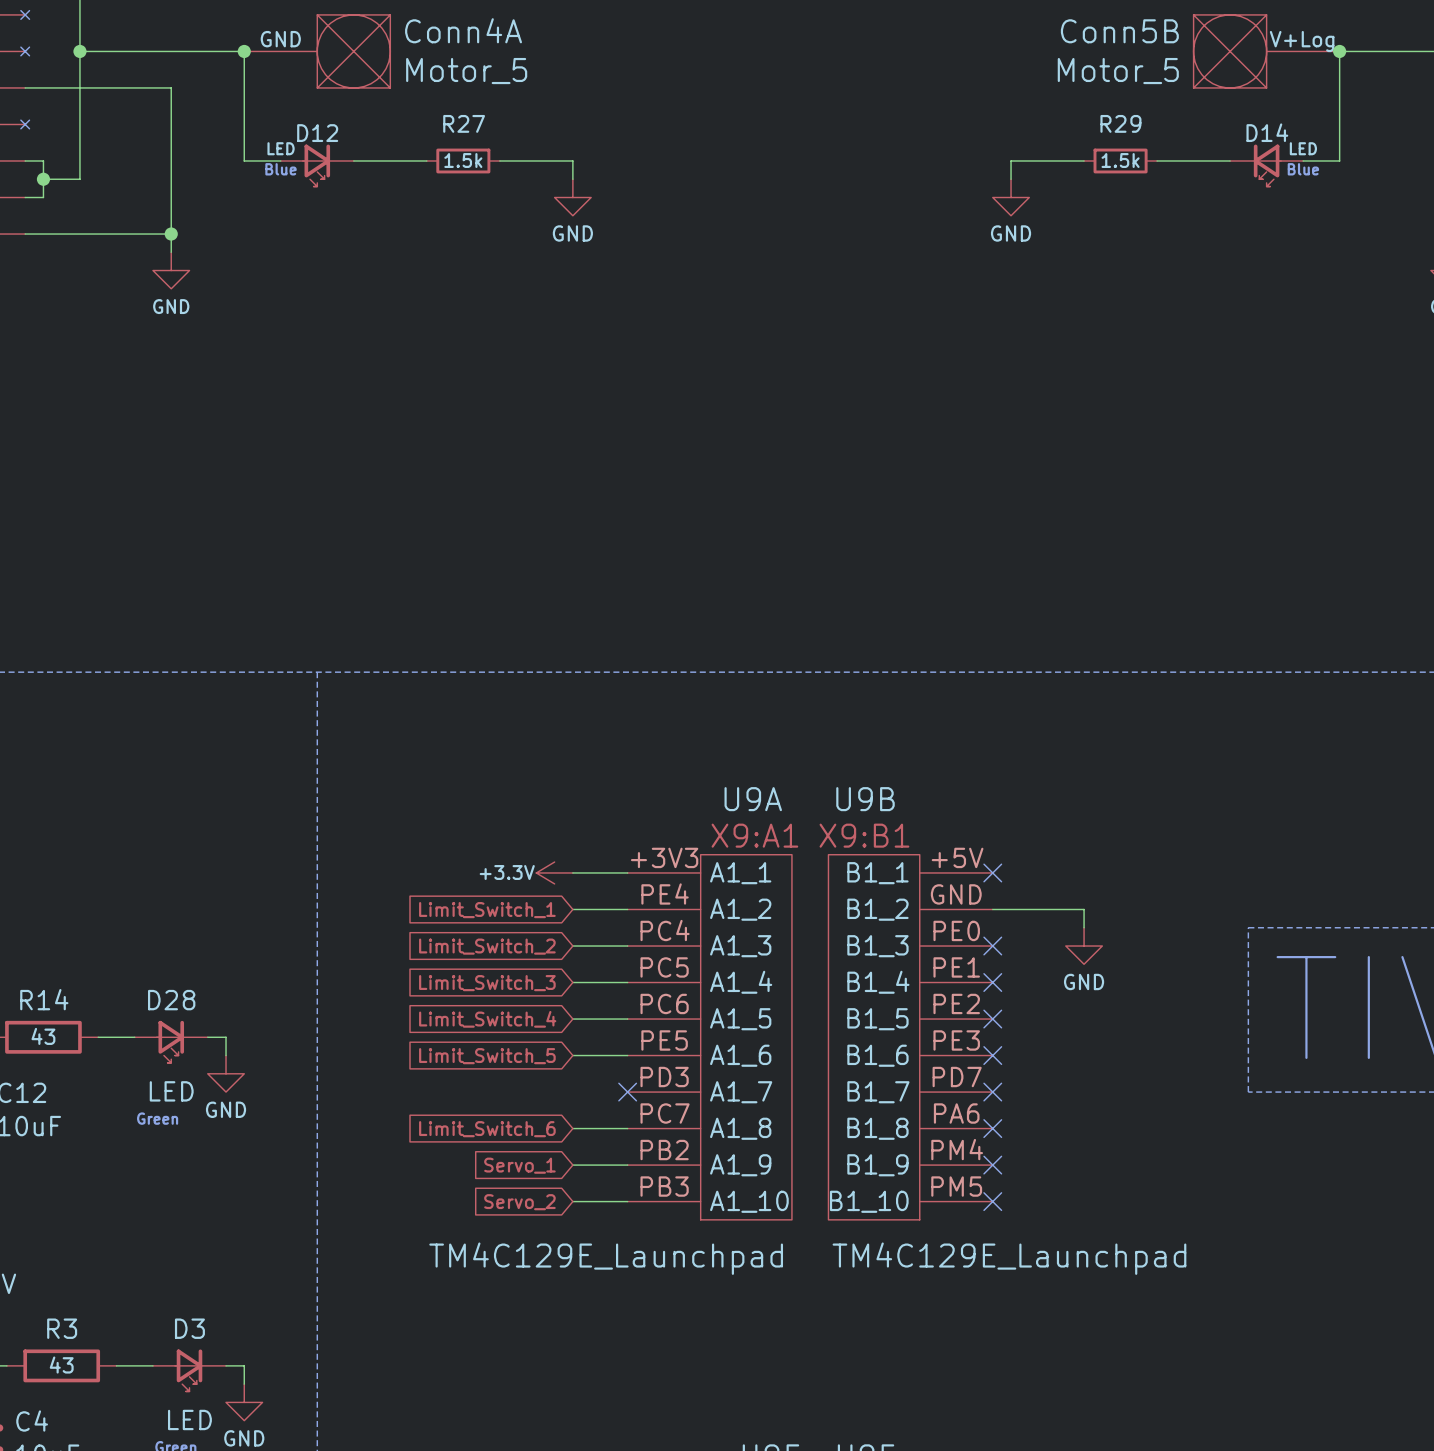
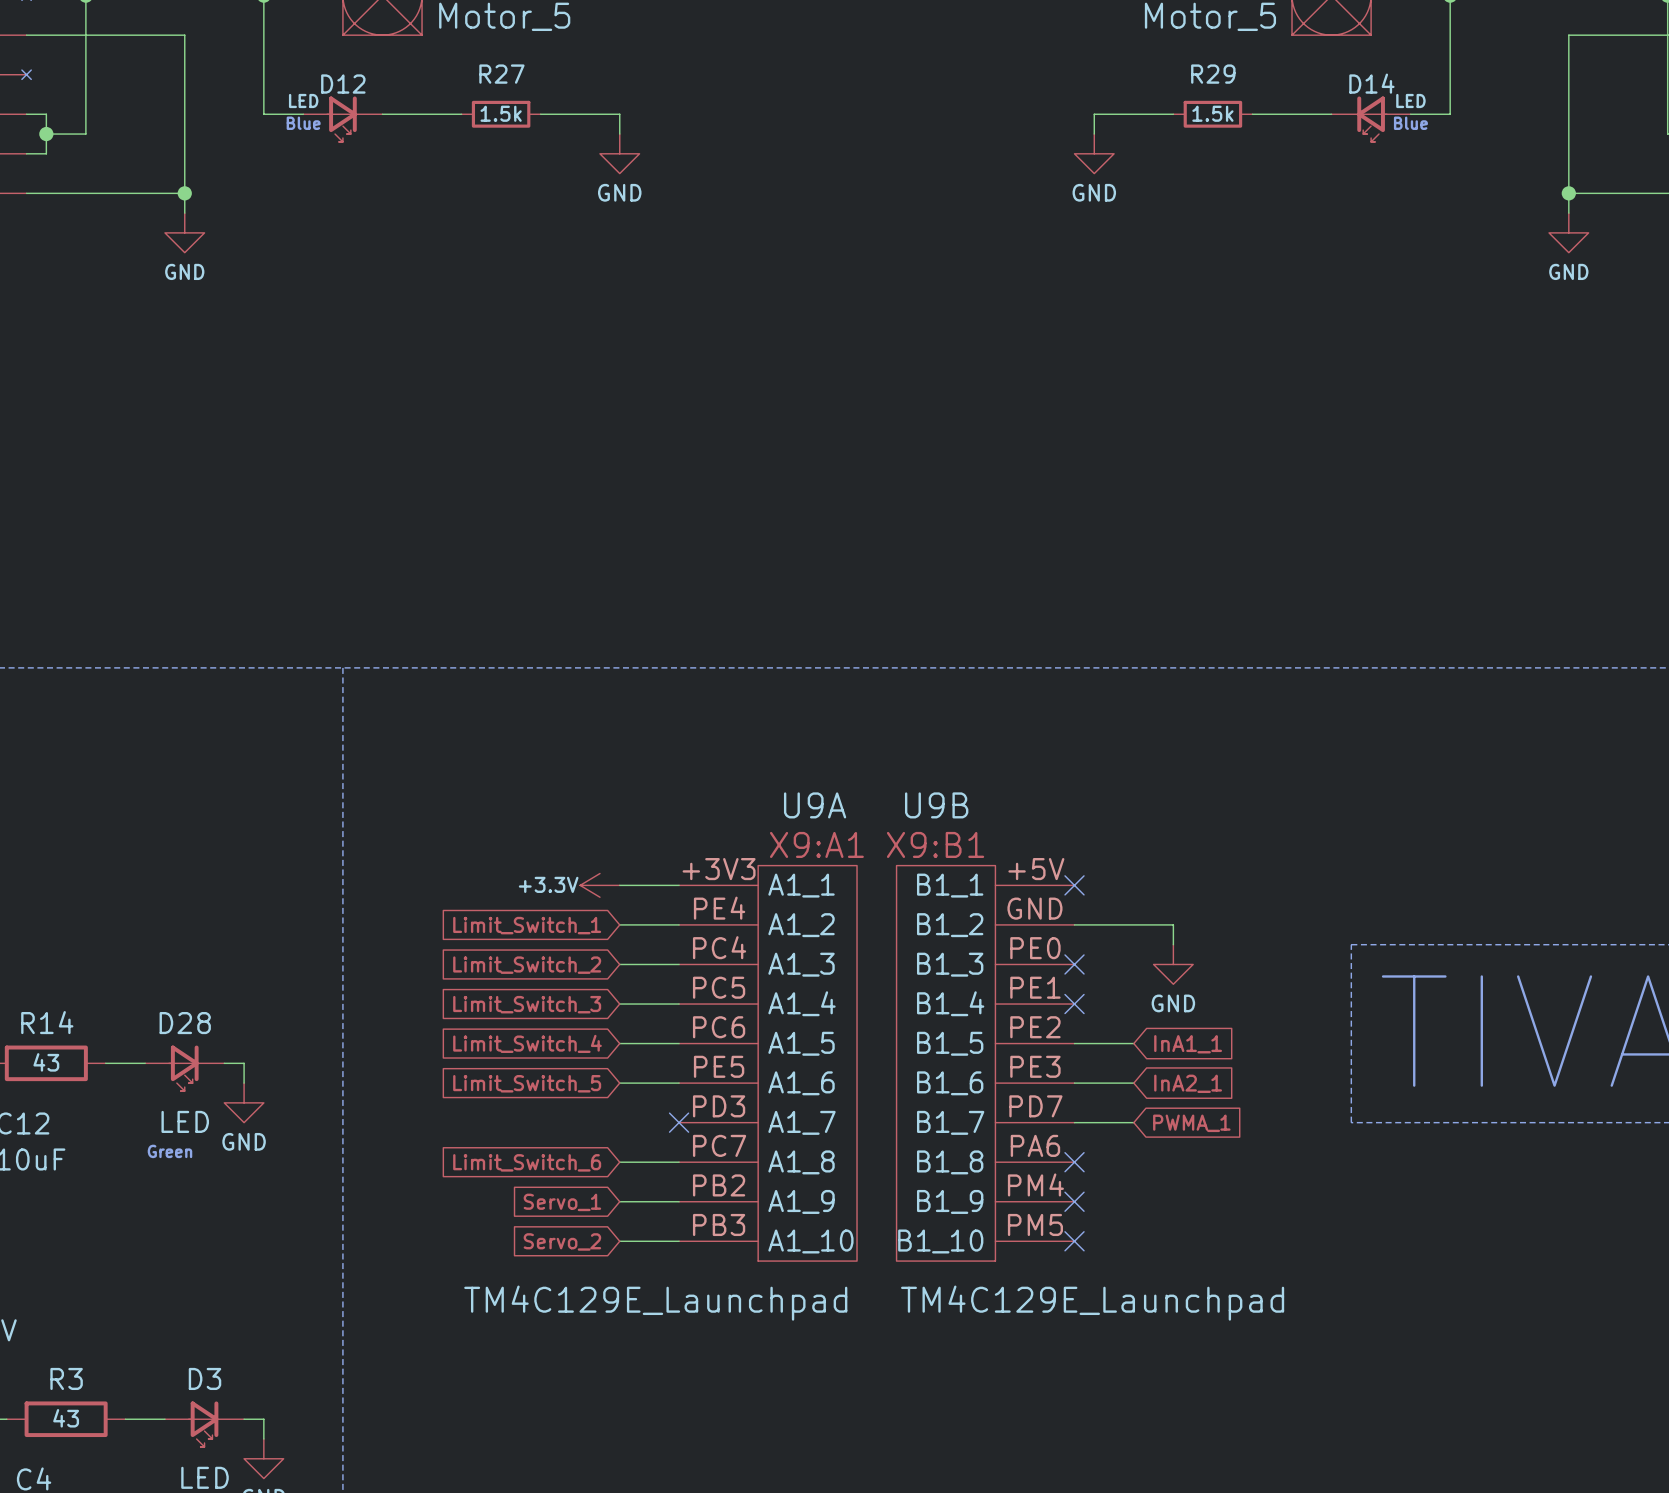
wire: none -> (1074, 1043) (1133, 1043)
no-connect mark: (992, 1019) -> none
global label: none -> InA1_1 (1188, 1044)
wire: none -> (1074, 1083) (1133, 1083)
no-connect mark: (992, 1055) -> none
global label: none -> InA2_1 (1188, 1083)
wire: none -> (1074, 1122) (1133, 1122)
no-connect mark: (992, 1092) -> none
global label: none -> PWMA_1 (1191, 1123)

